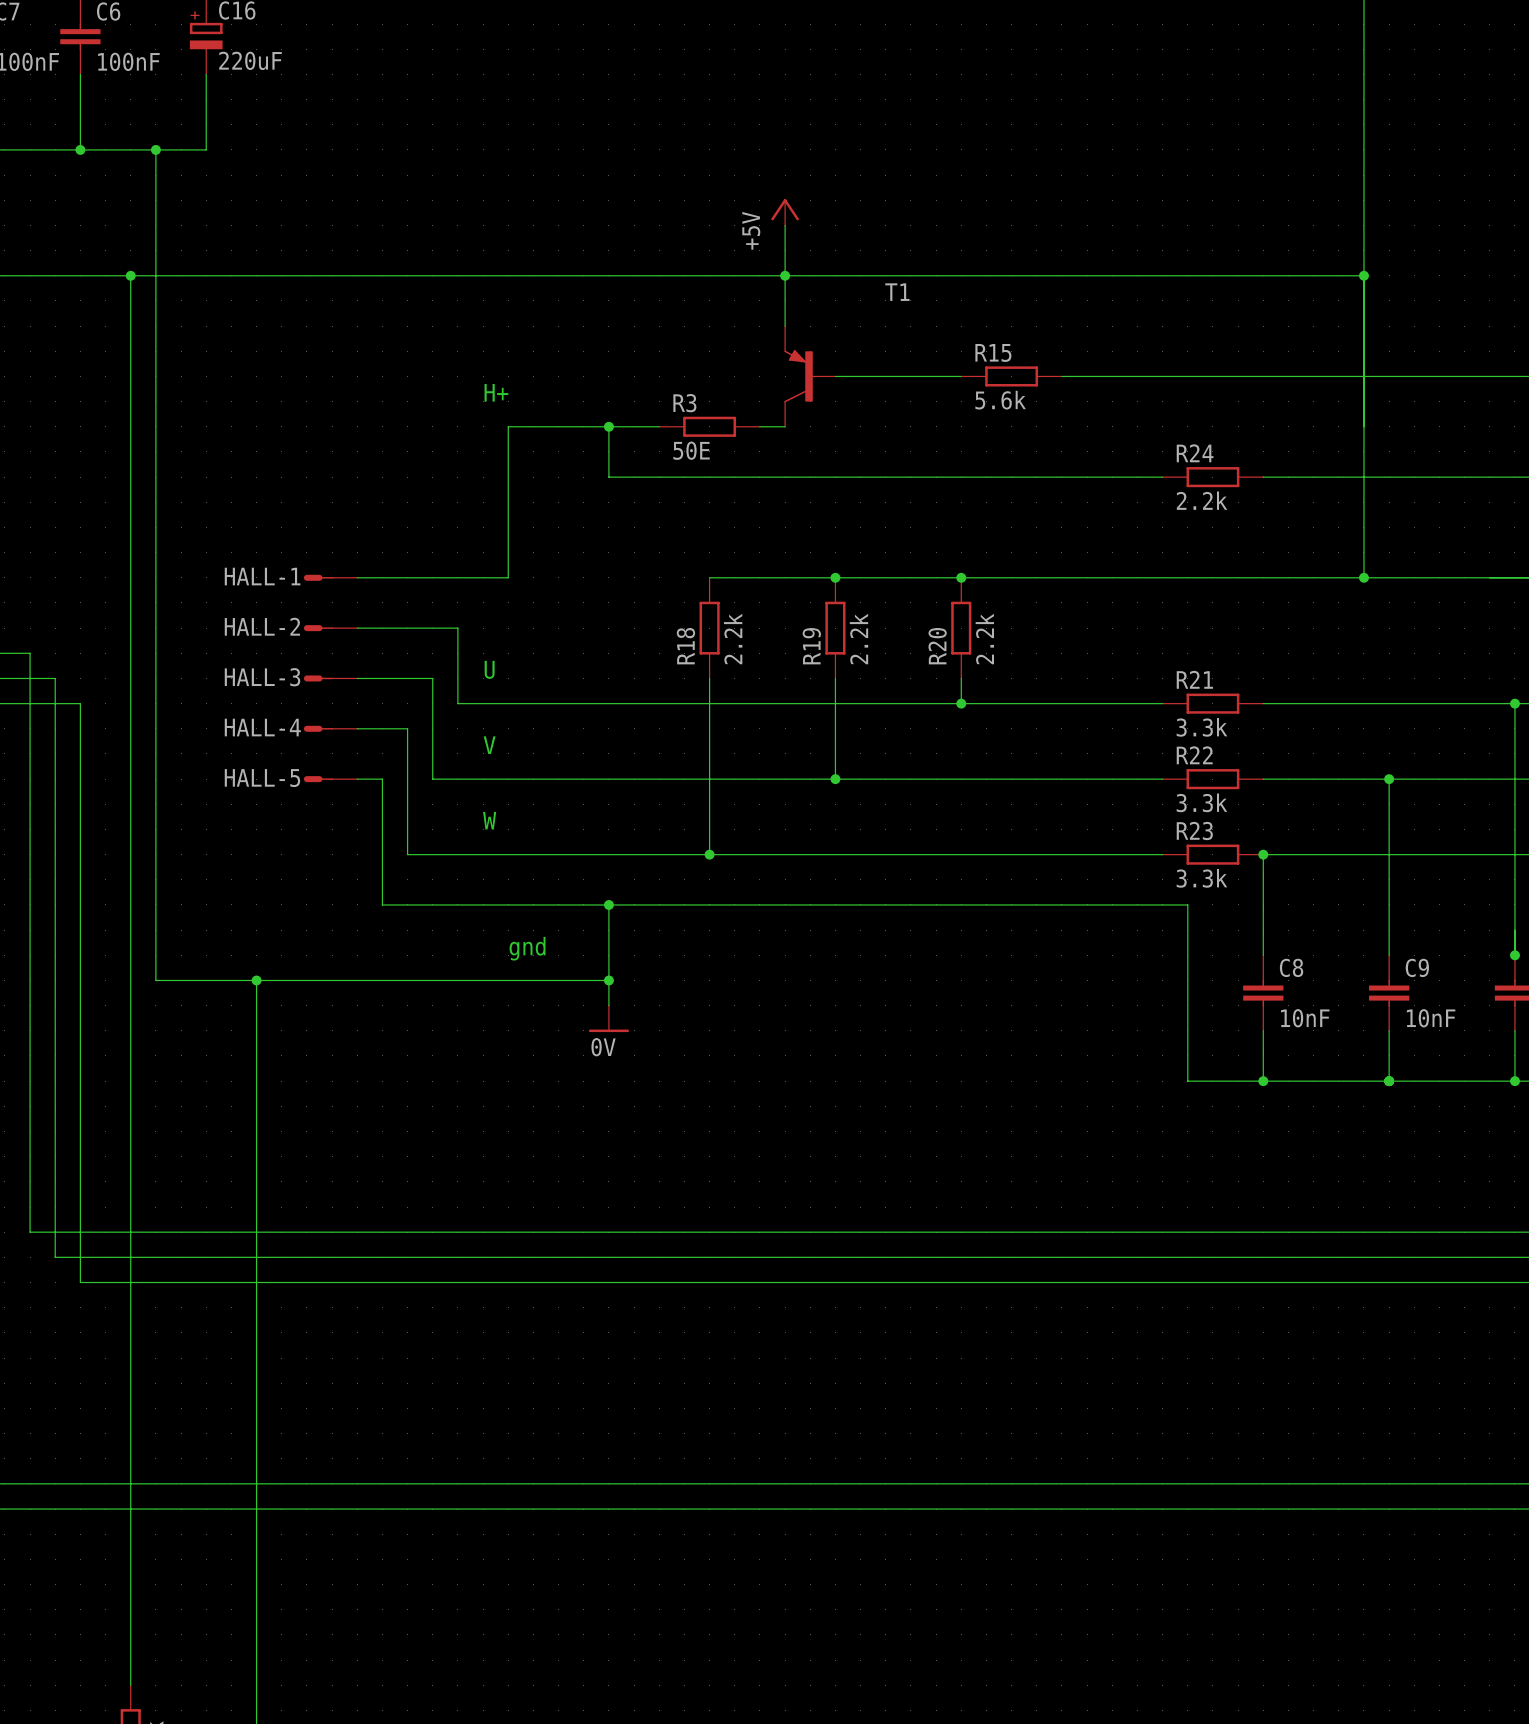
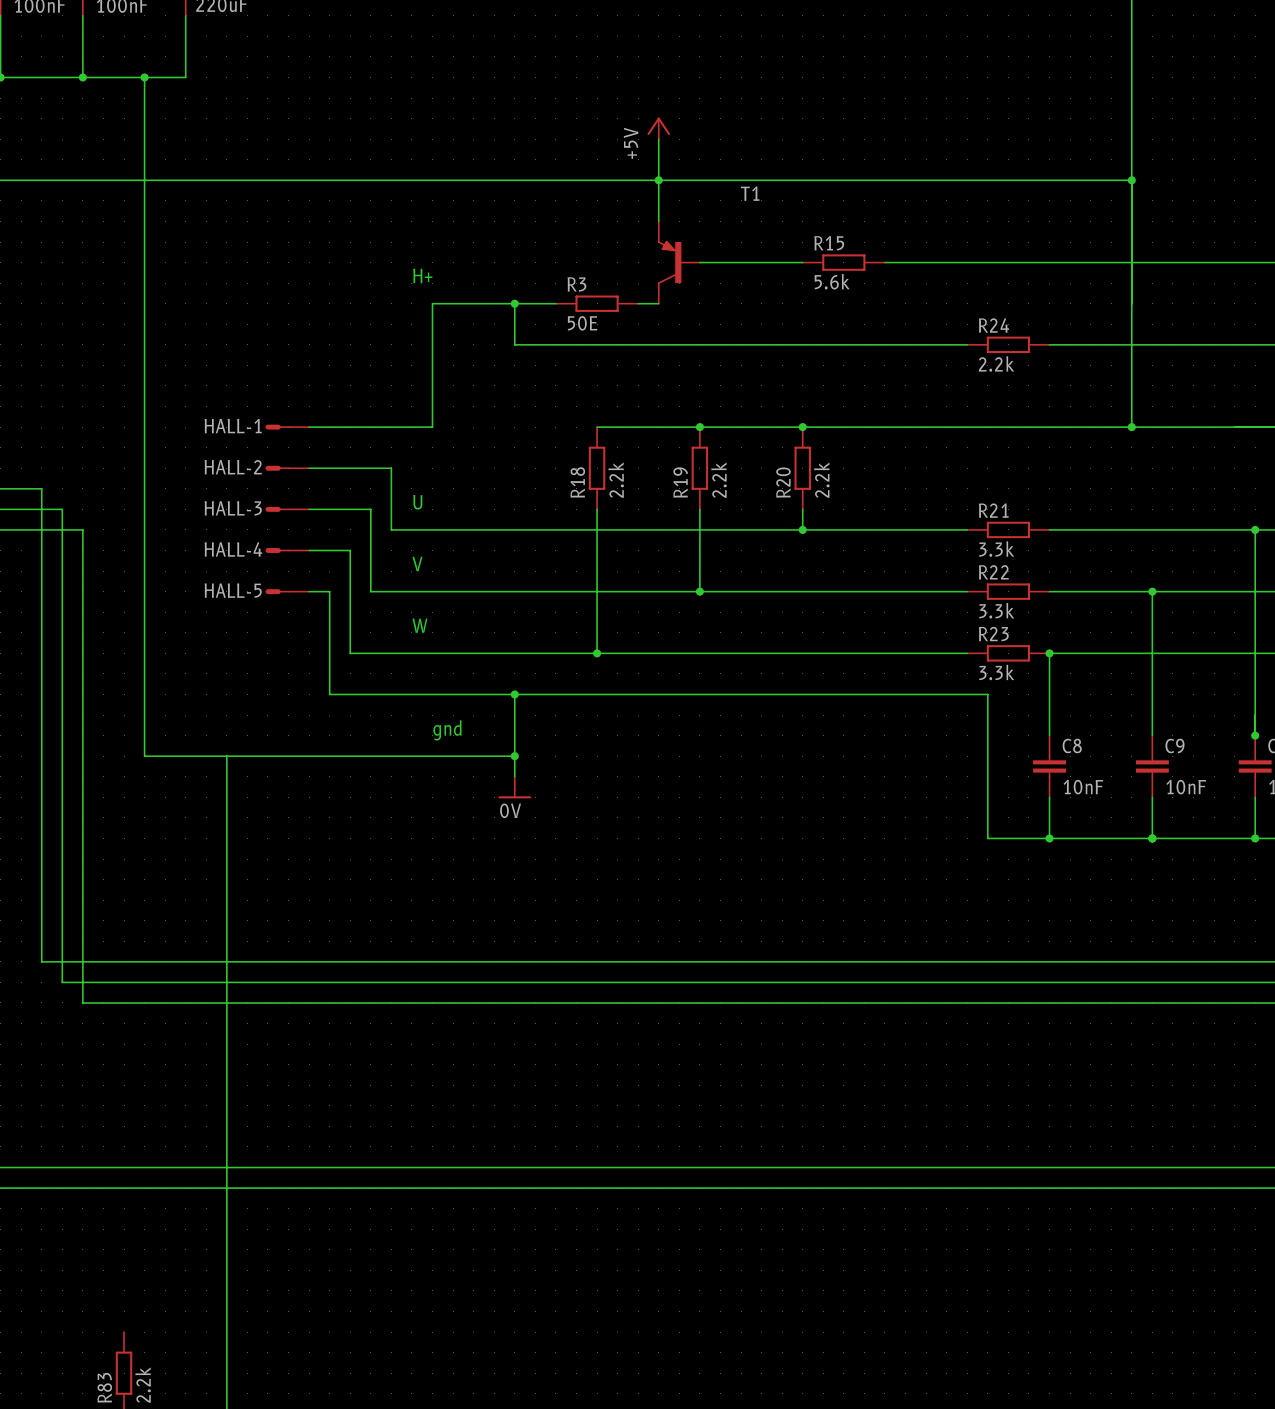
wire: (130, 275) (130, 1685) -> none
junction: (130, 275) -> none
junction: (256, 980) -> none

